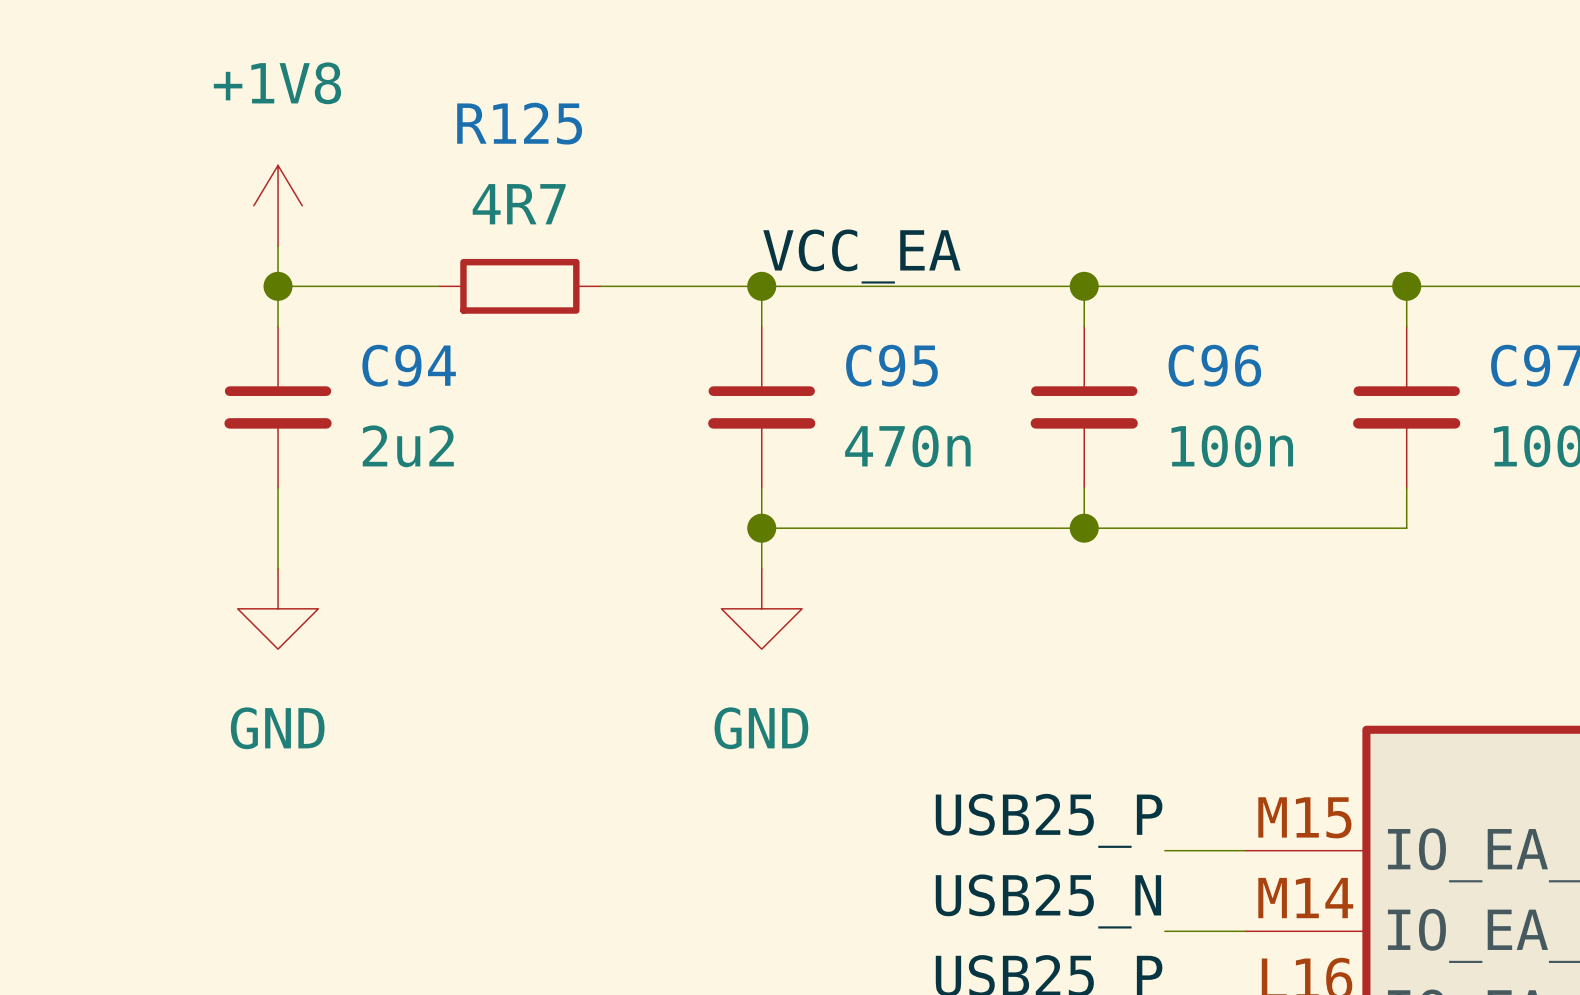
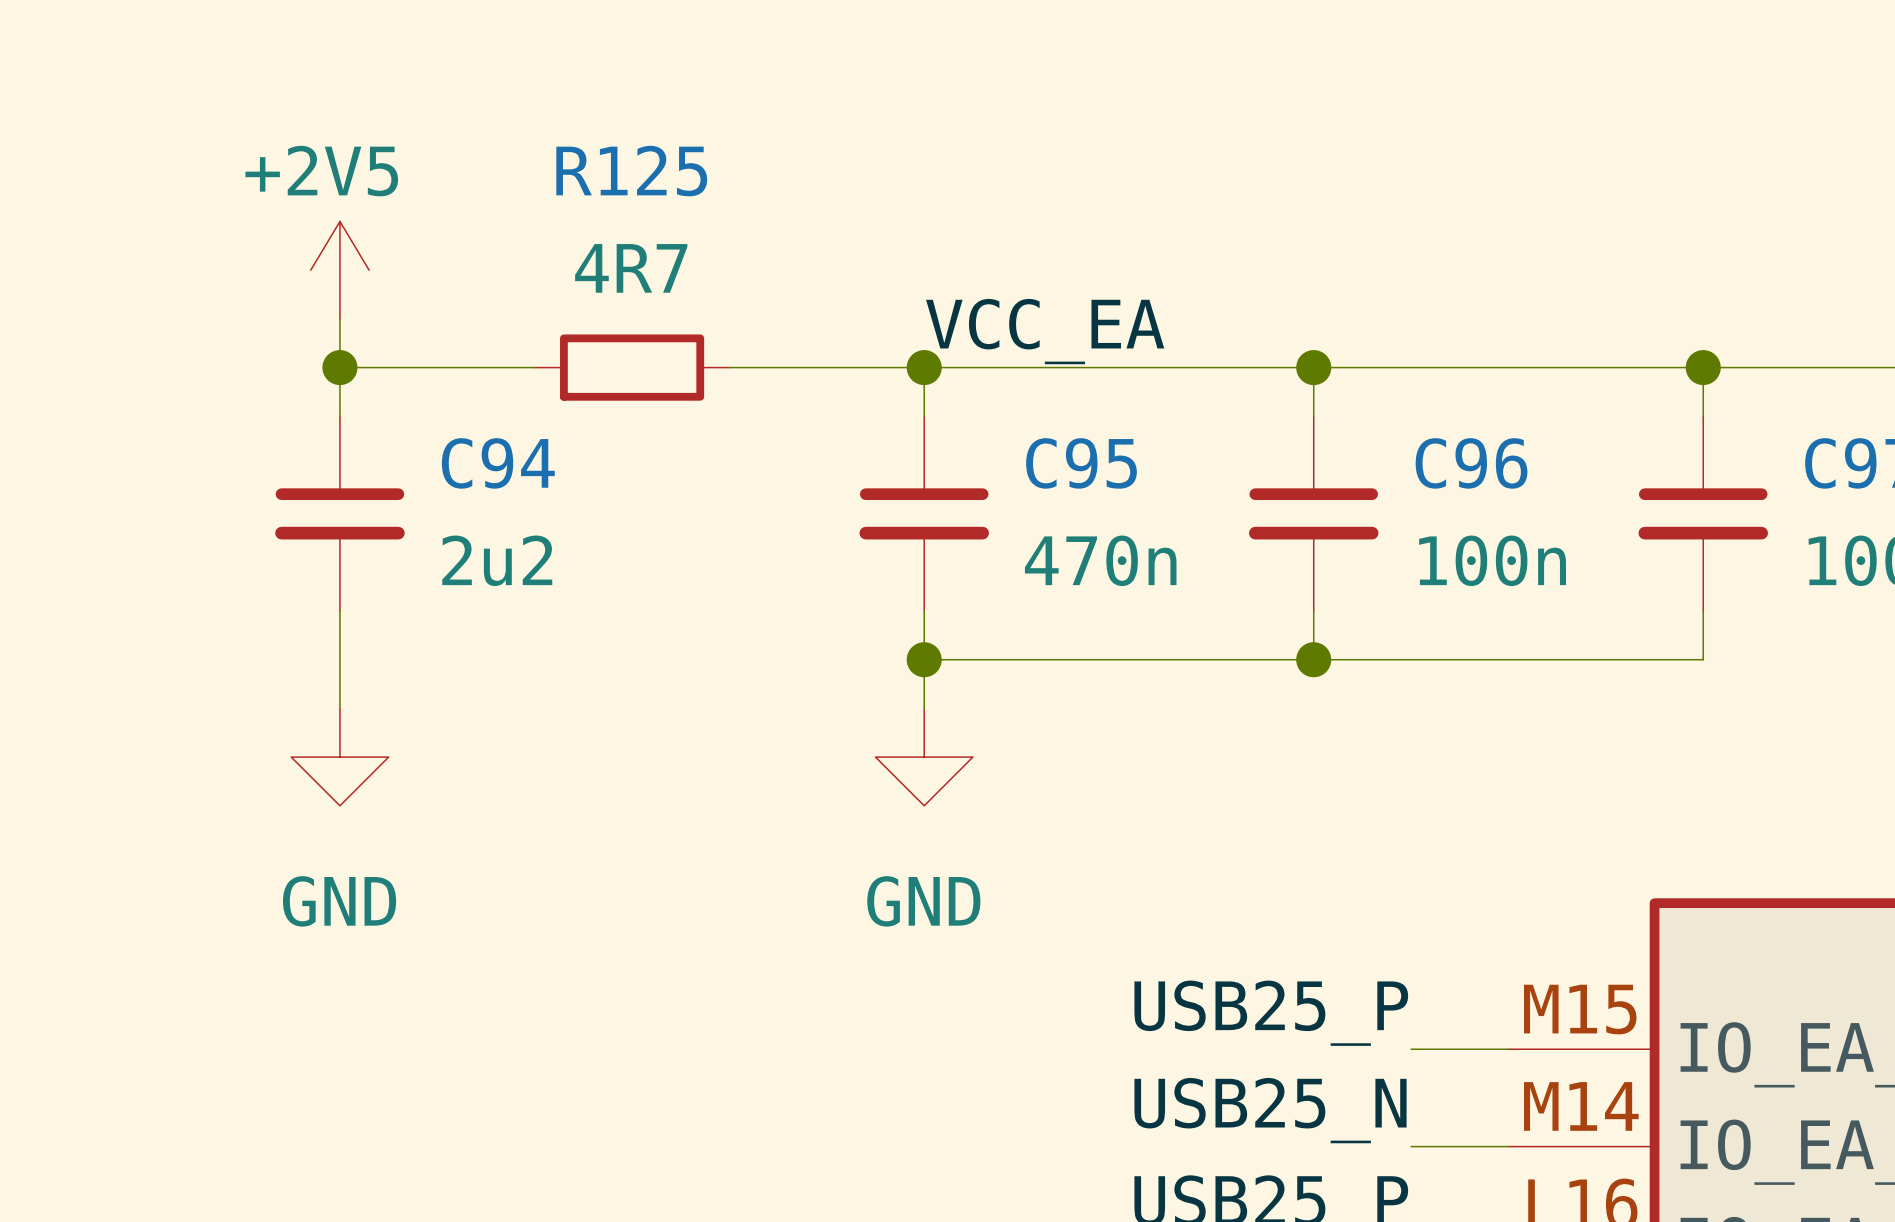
power symbol: +1V8 (278, 205) -> +2V5 (339, 270)

